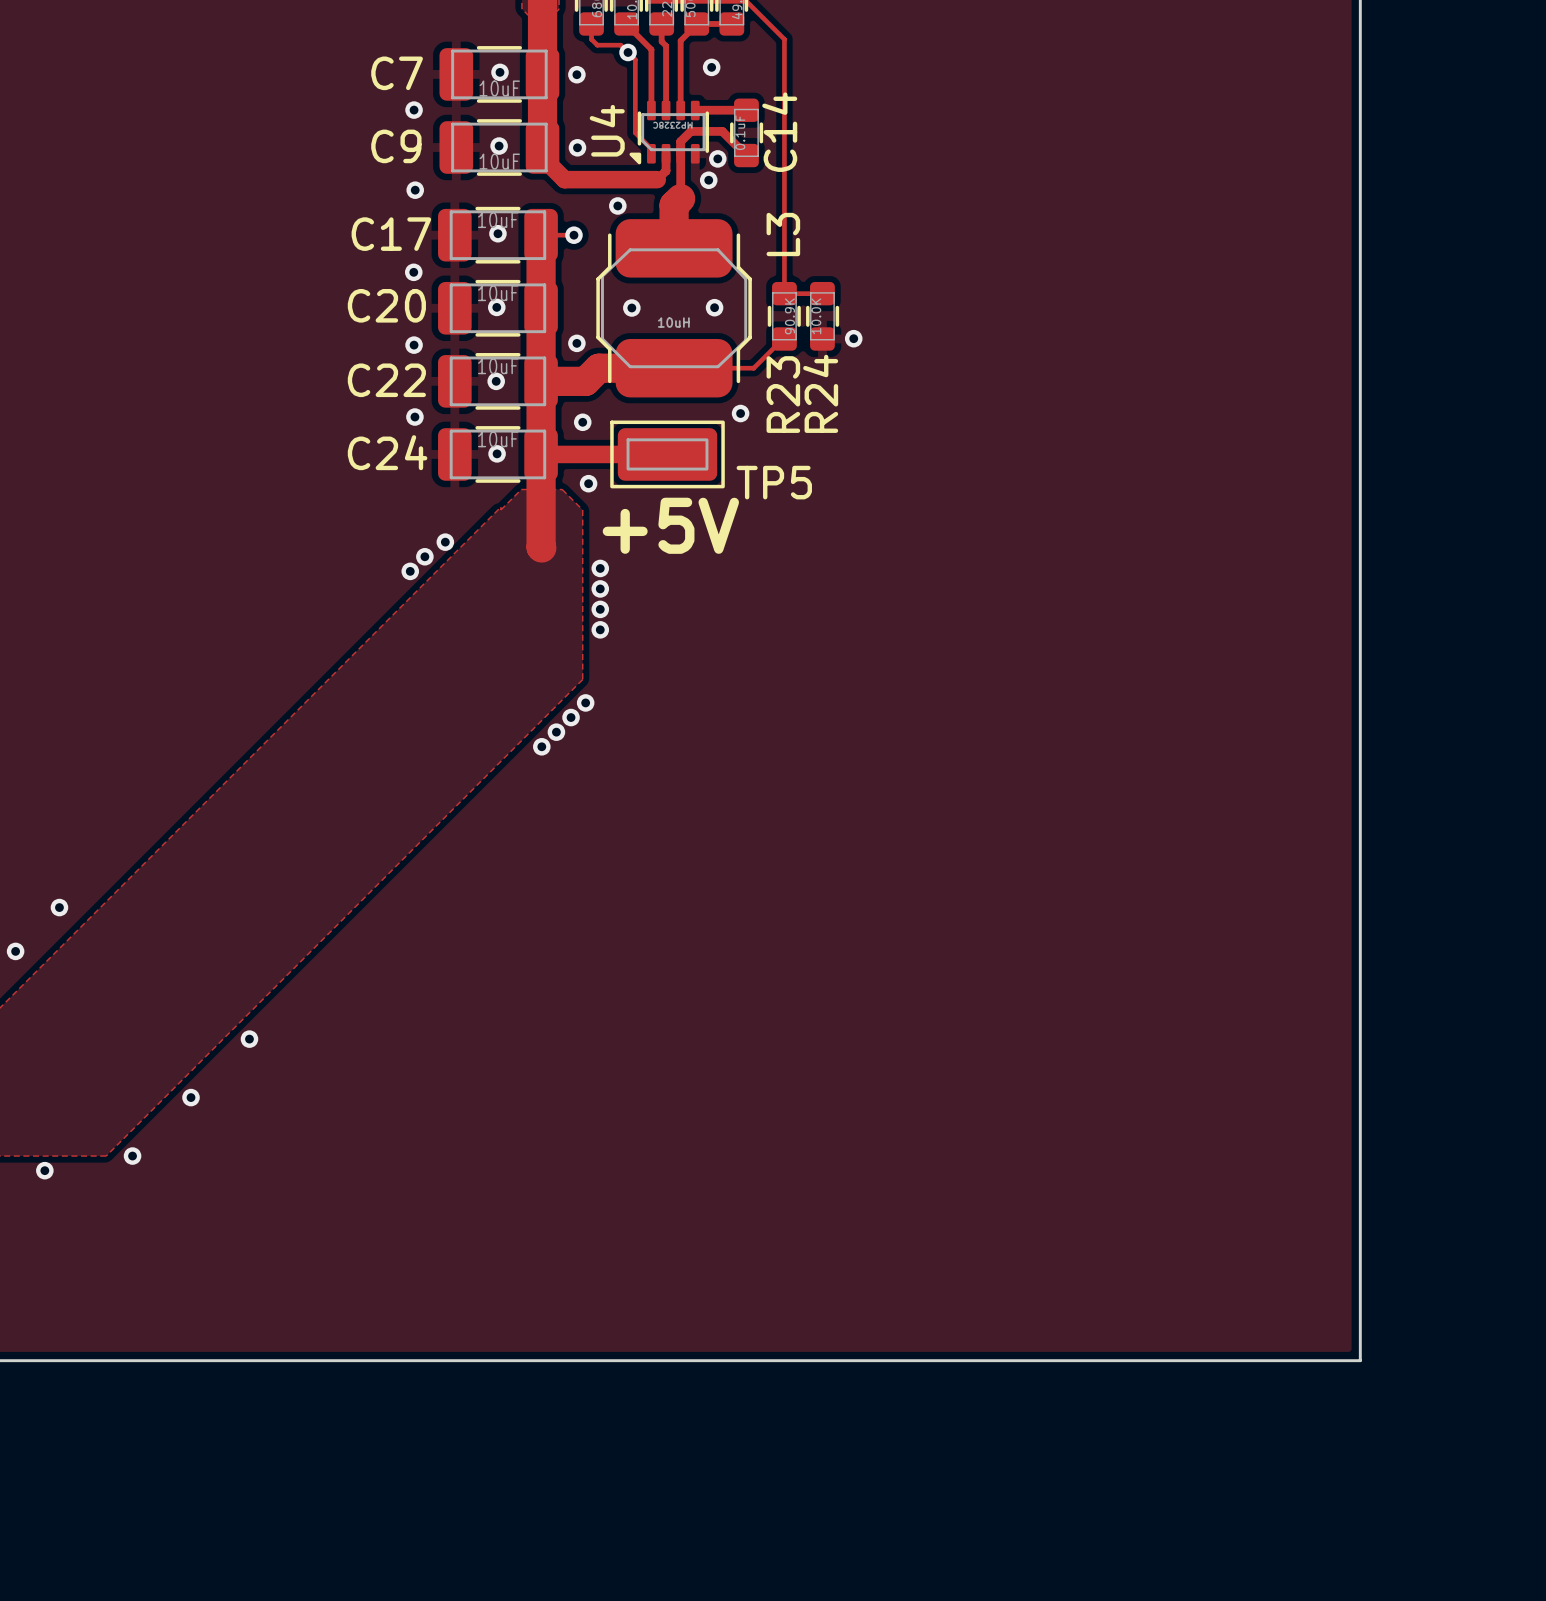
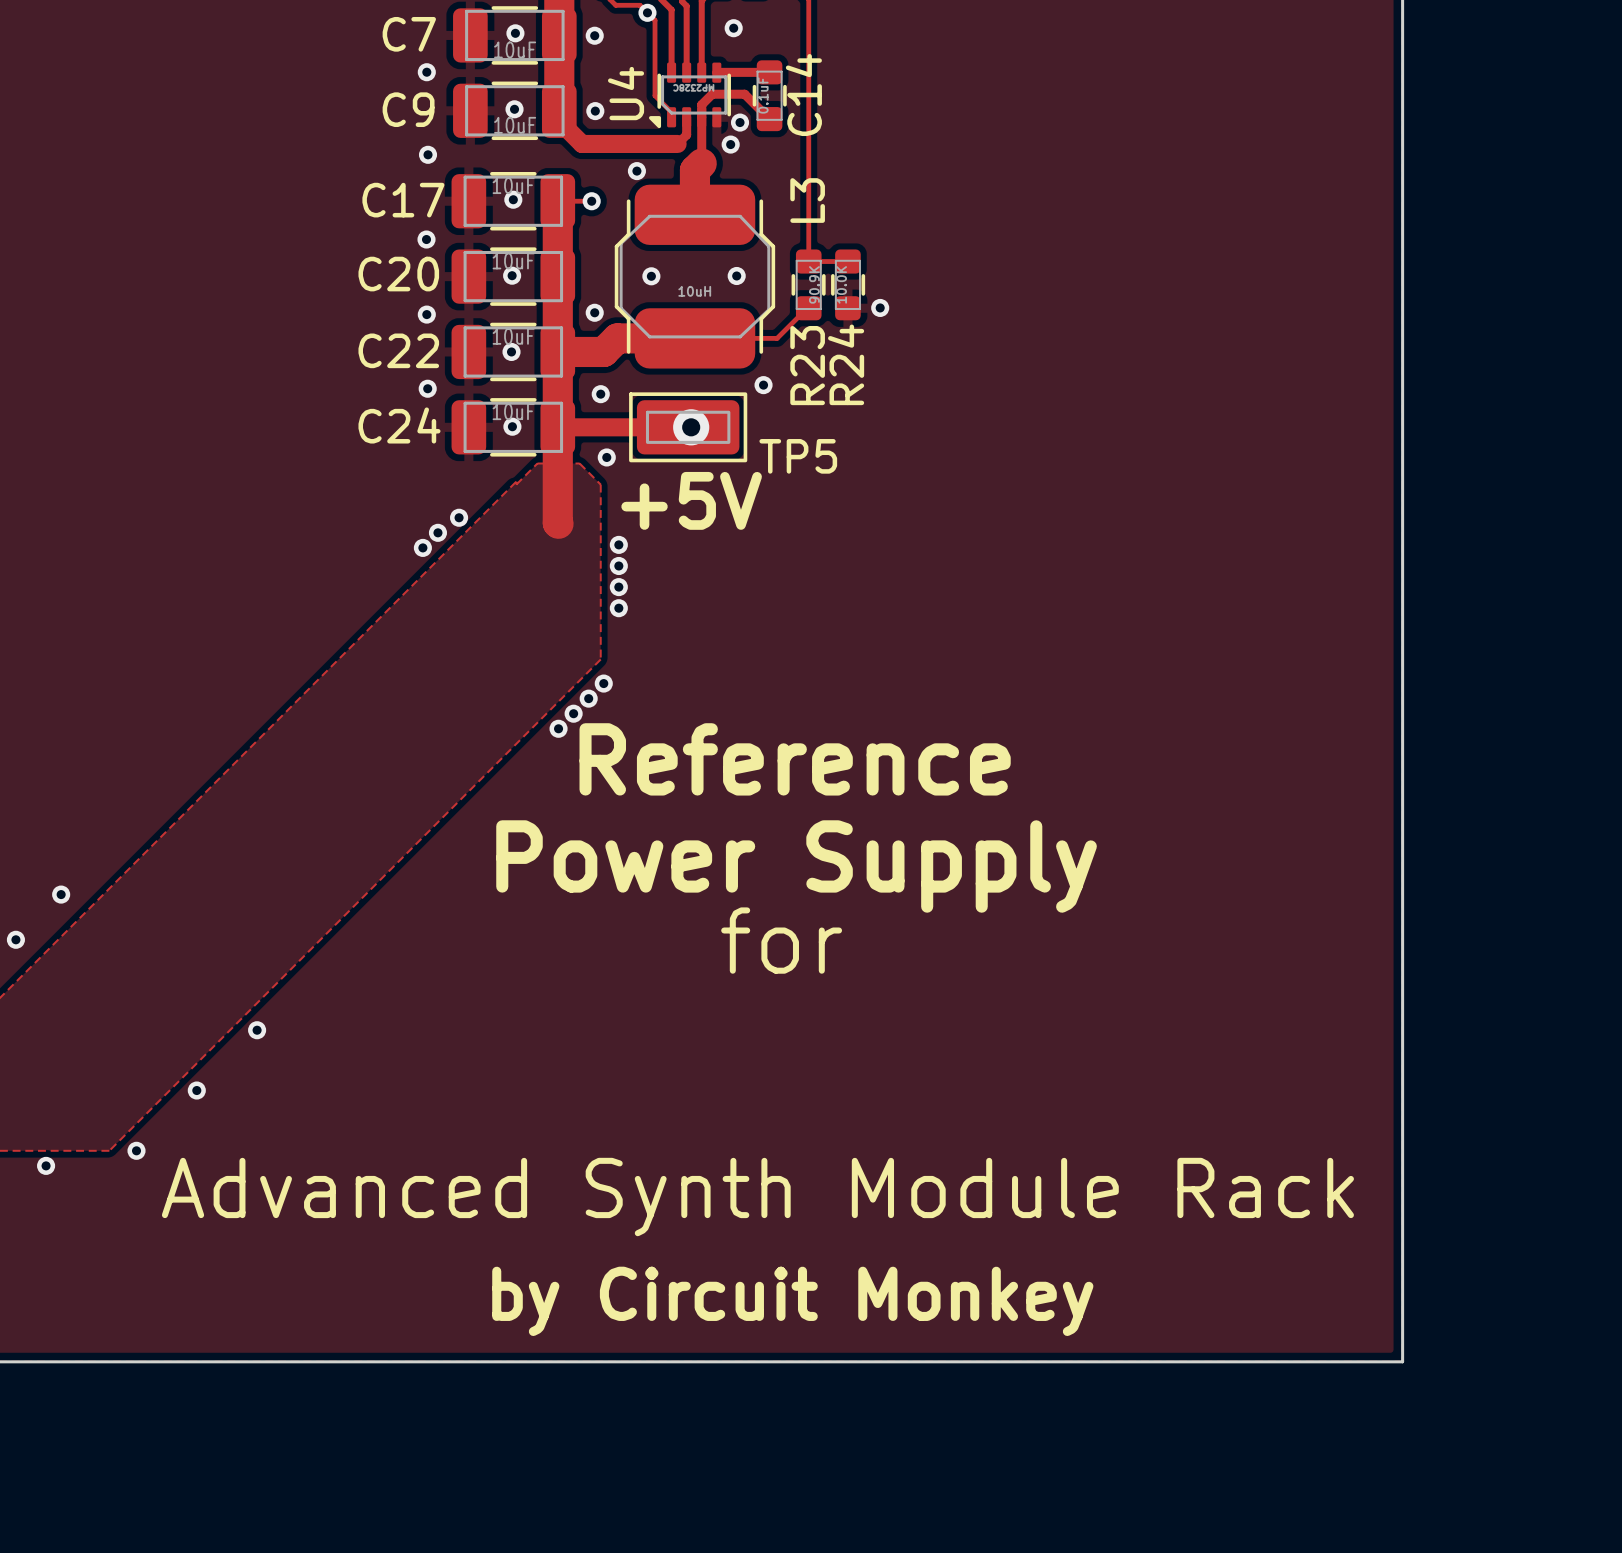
via: none -> (691, 427)
text: none -> Reference (795, 759)
text: none -> Power Supply (796, 866)
text: none -> for (781, 940)
text: none -> Advanced Synth Module Rack (757, 1197)
text: none -> by Circuit Monkey (792, 1301)

